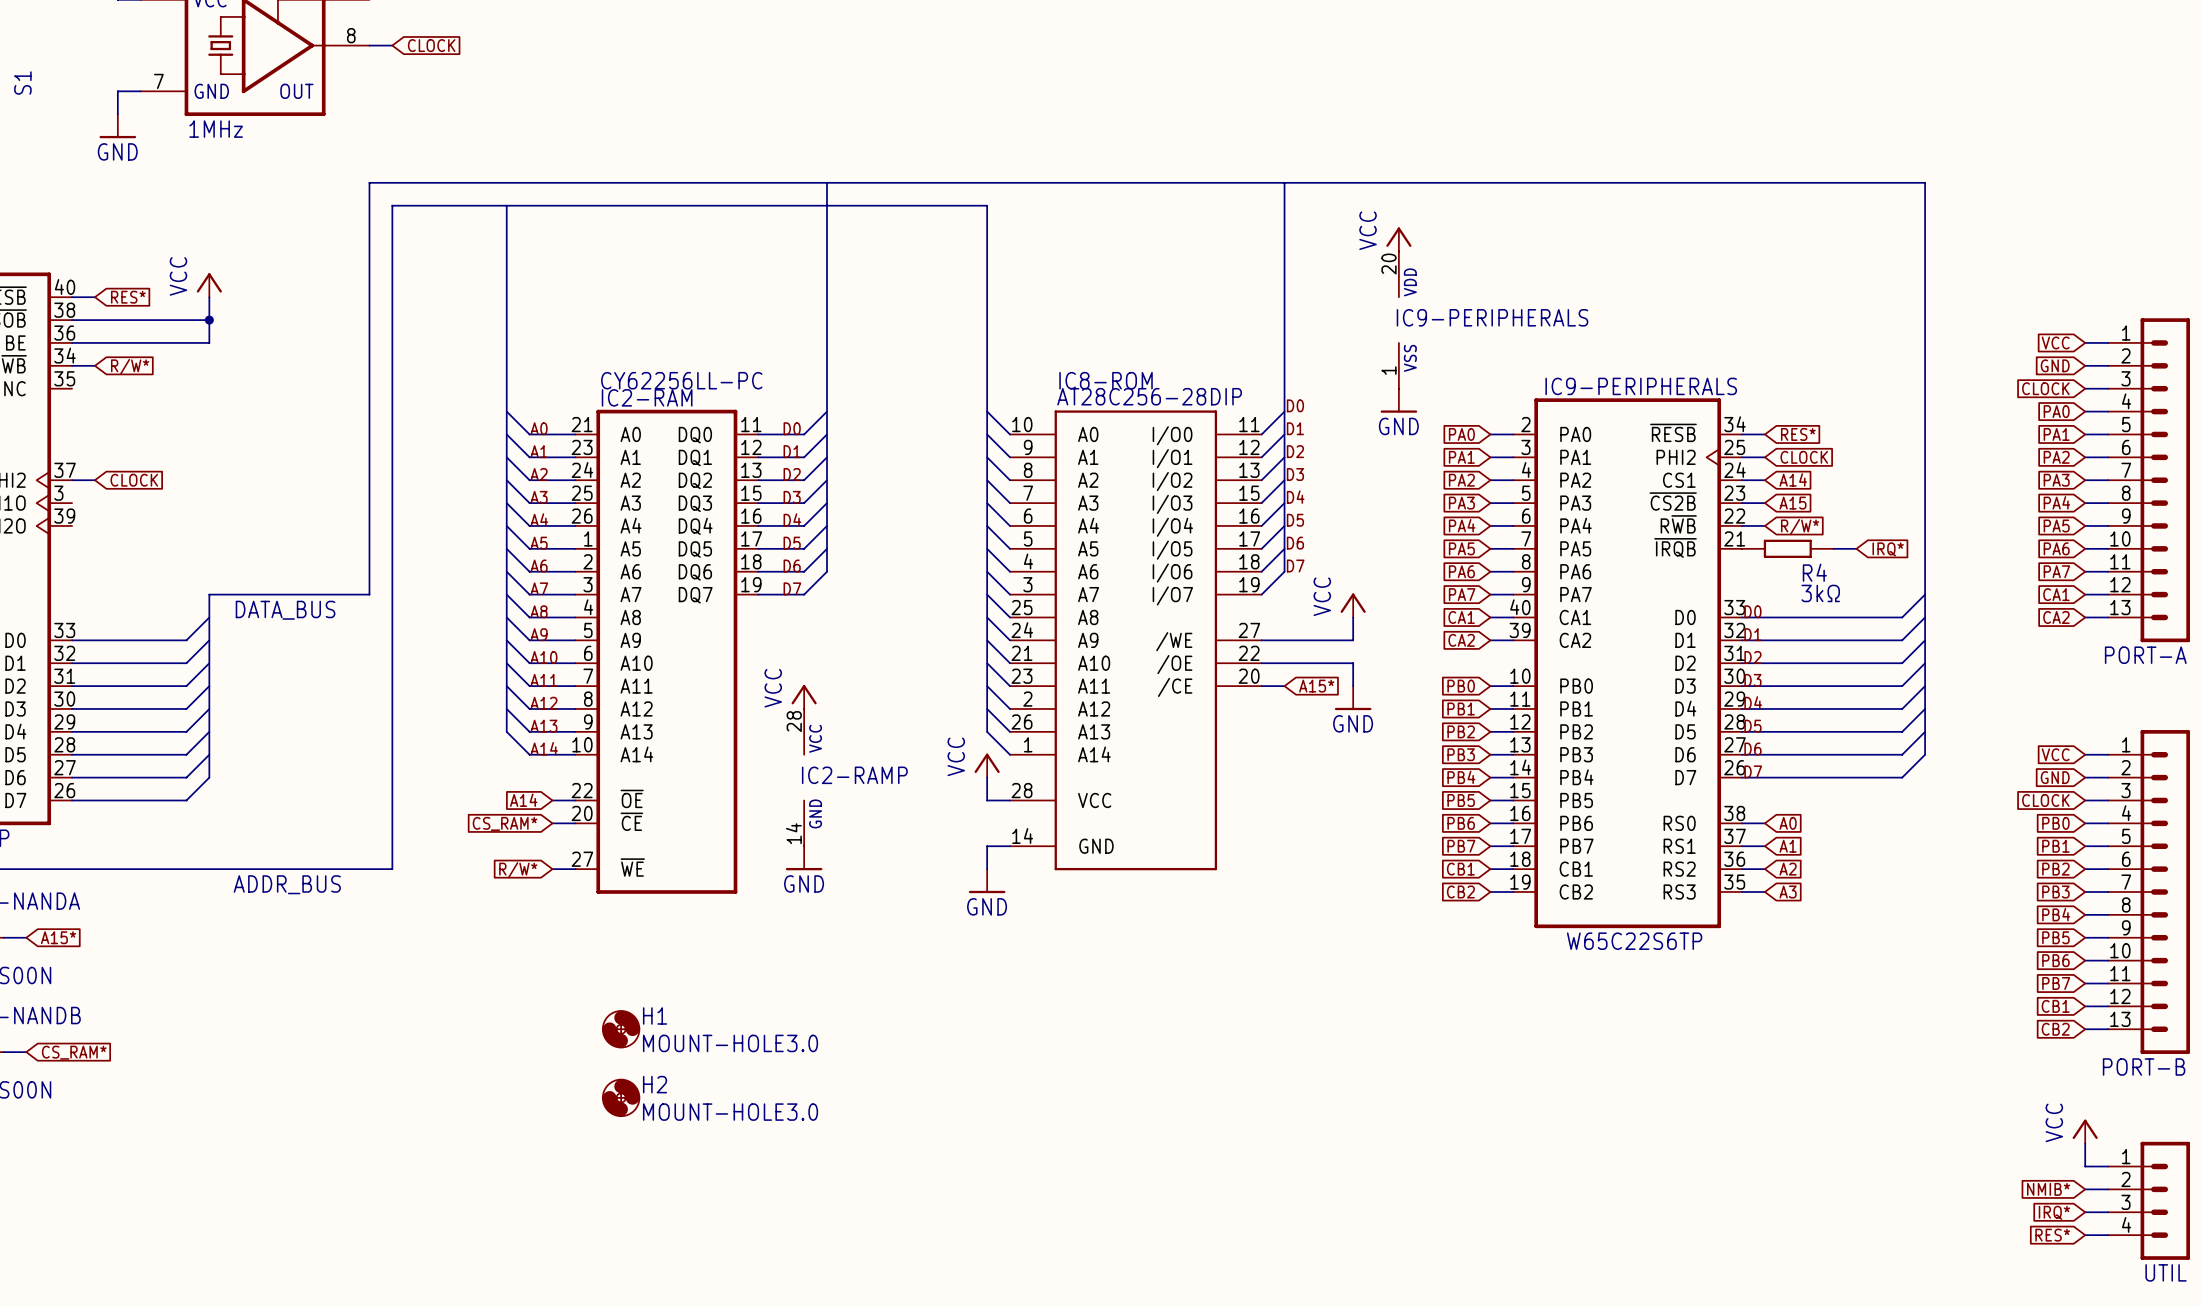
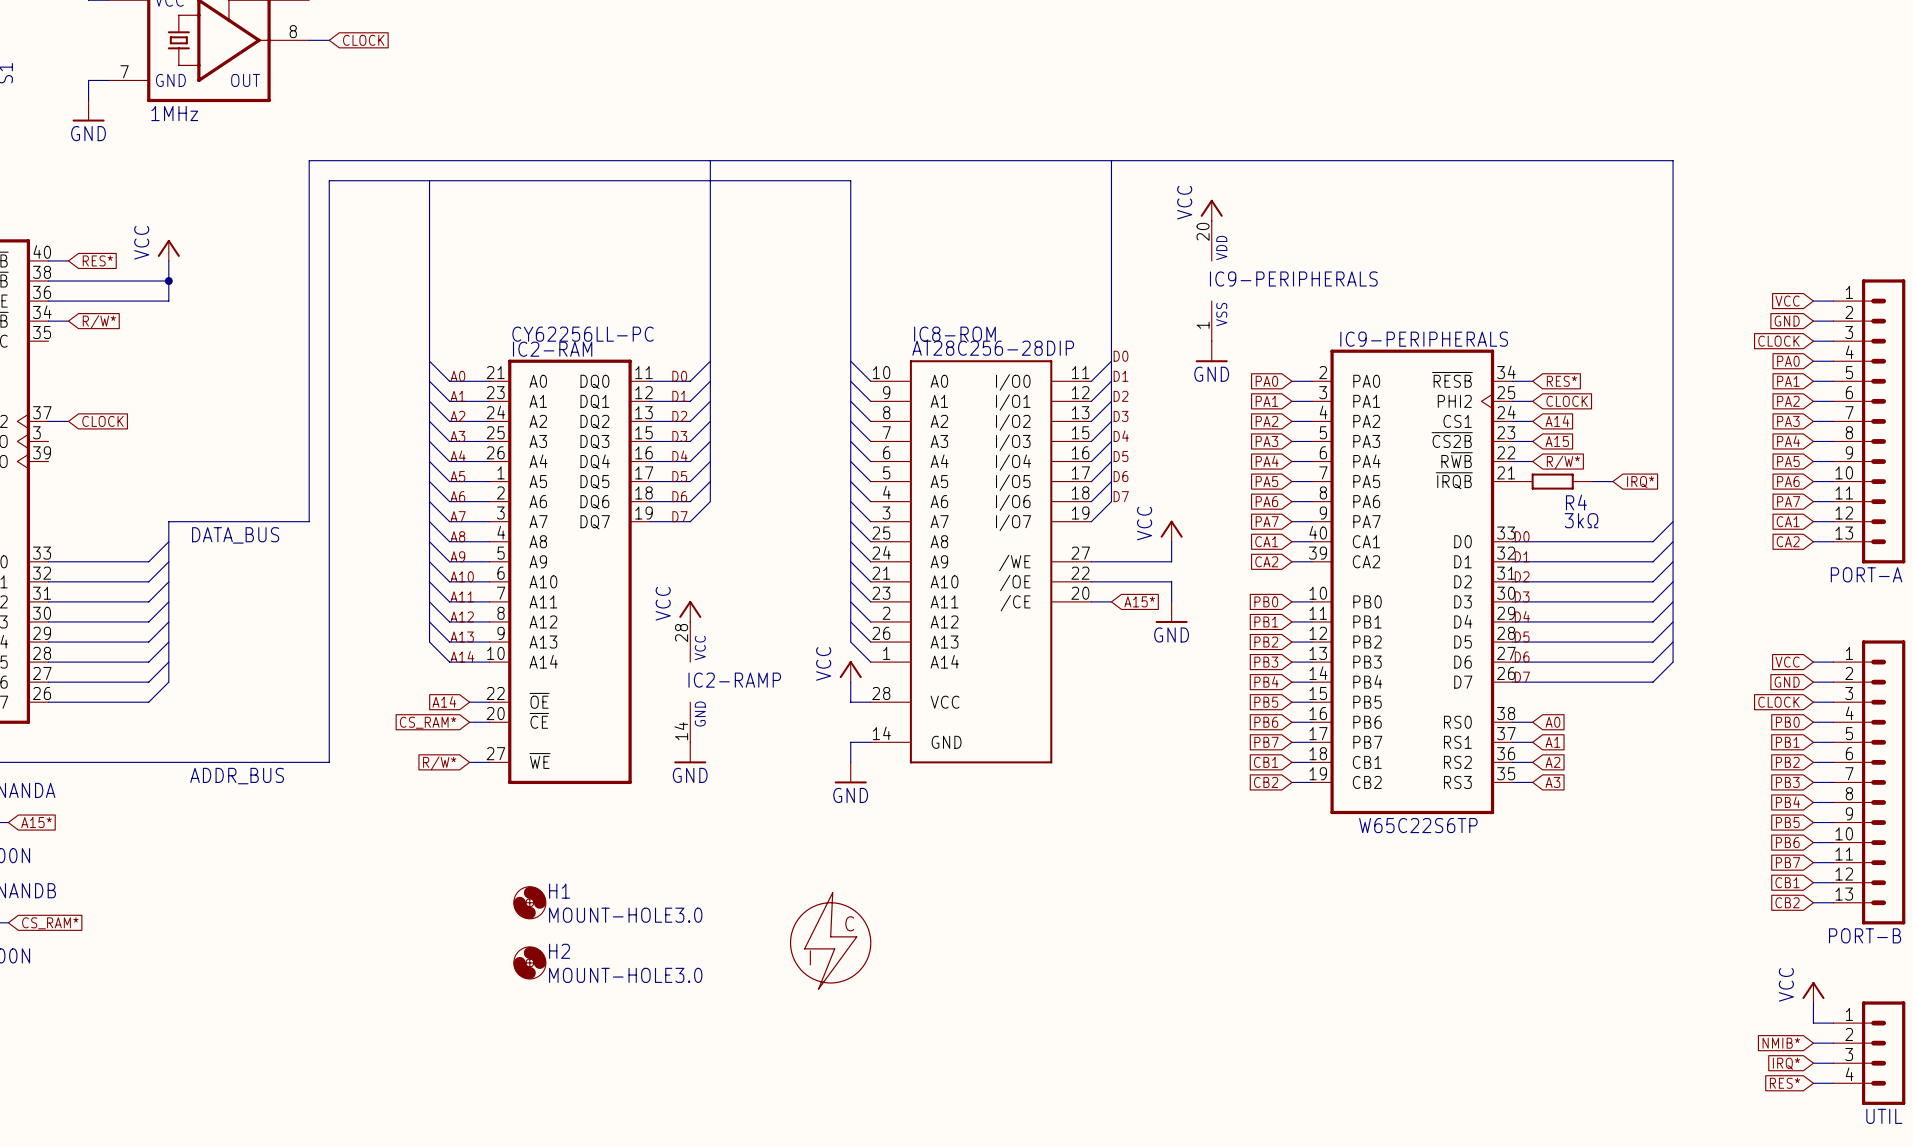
part: none -> (830, 940)

